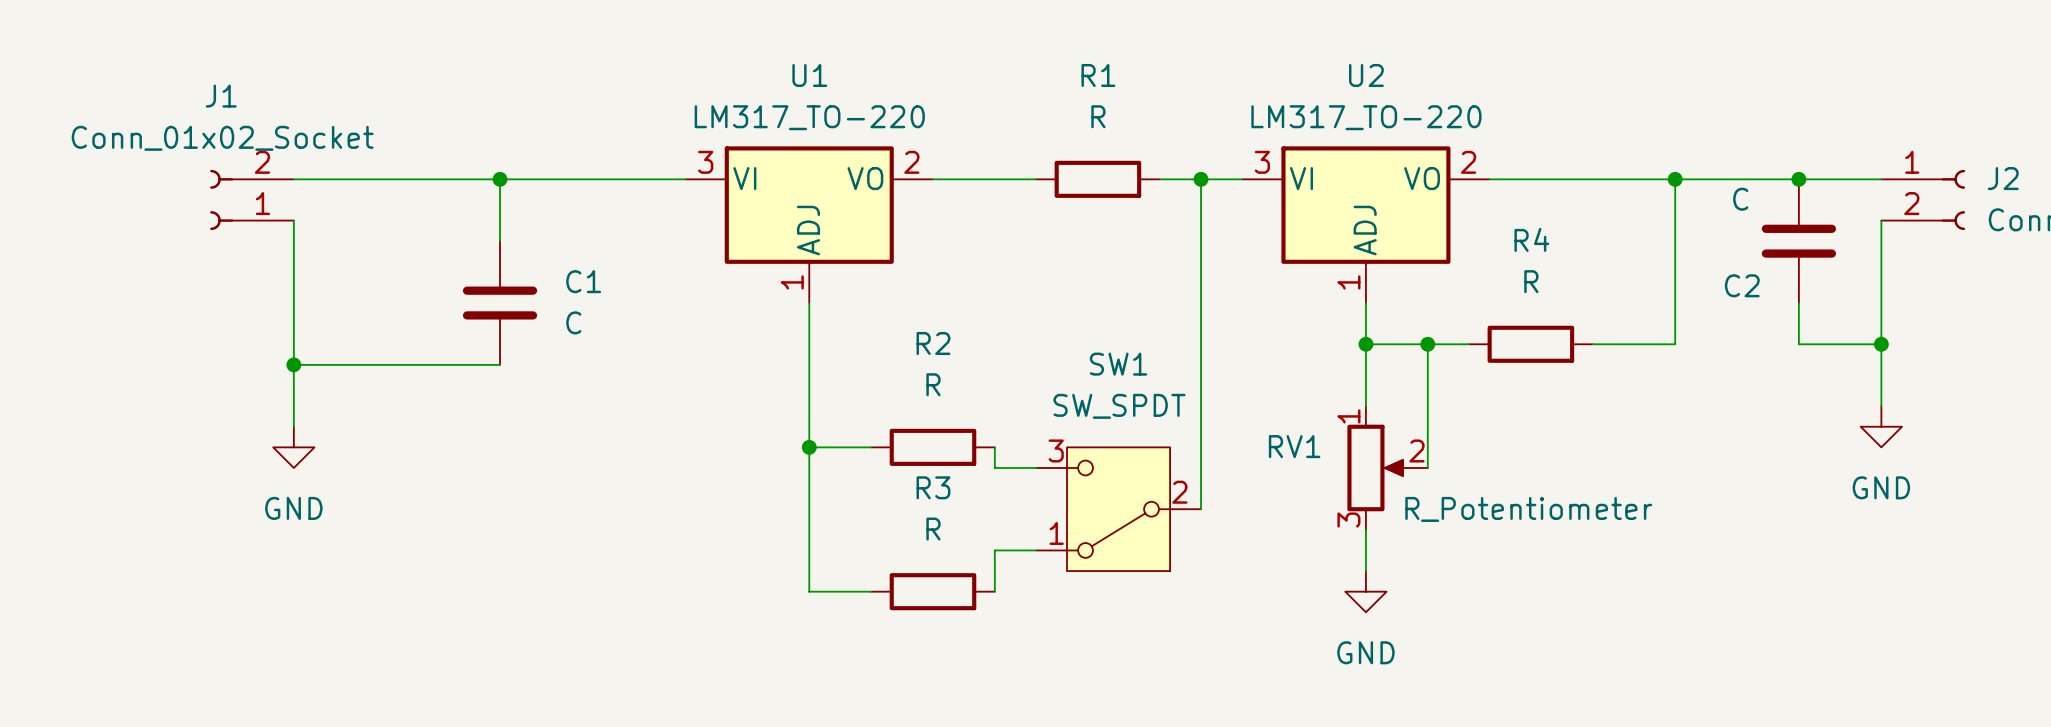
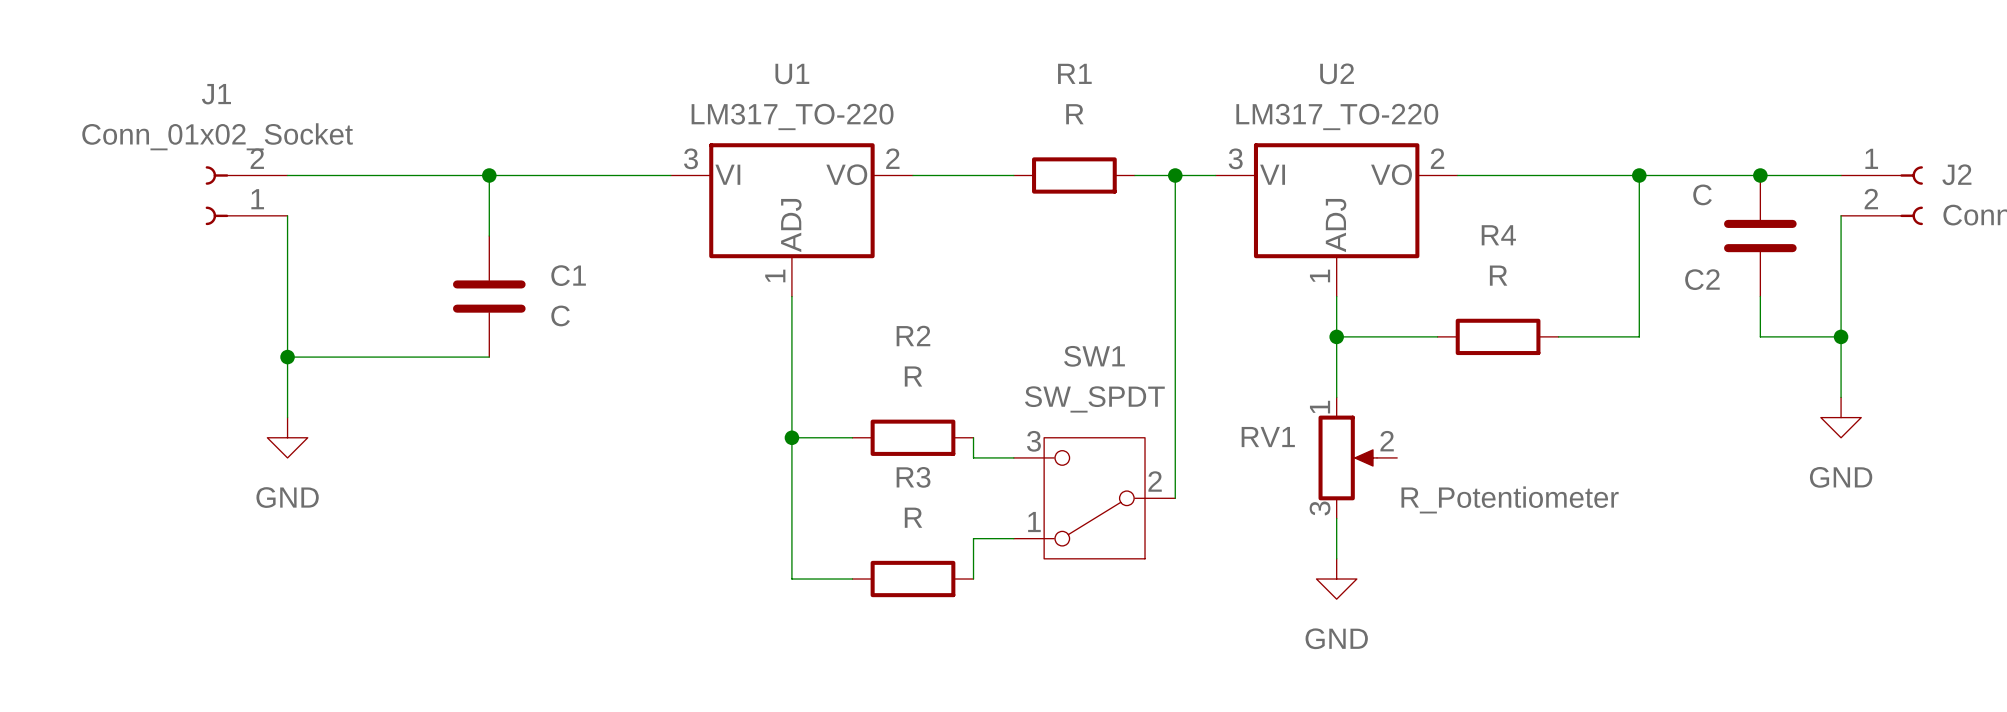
wire: (1427, 344) (1427, 467) -> none
junction: (1427, 344) -> none

